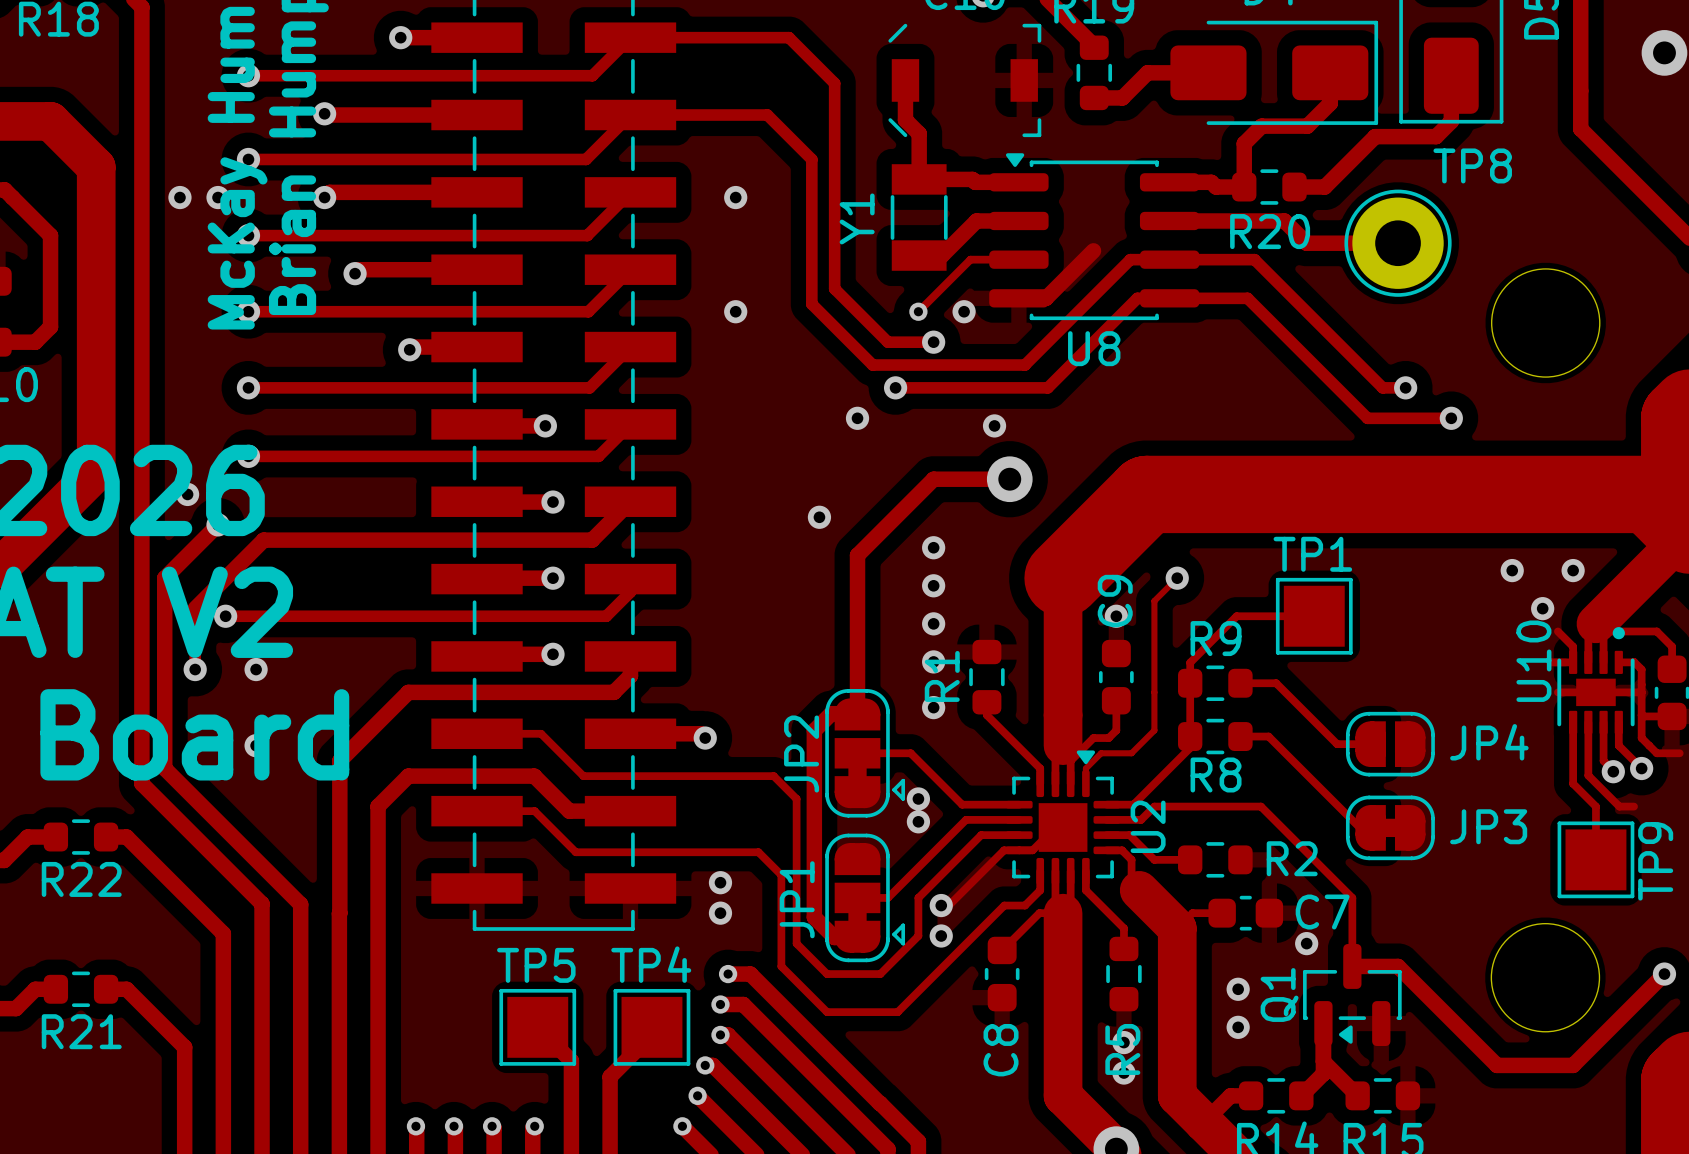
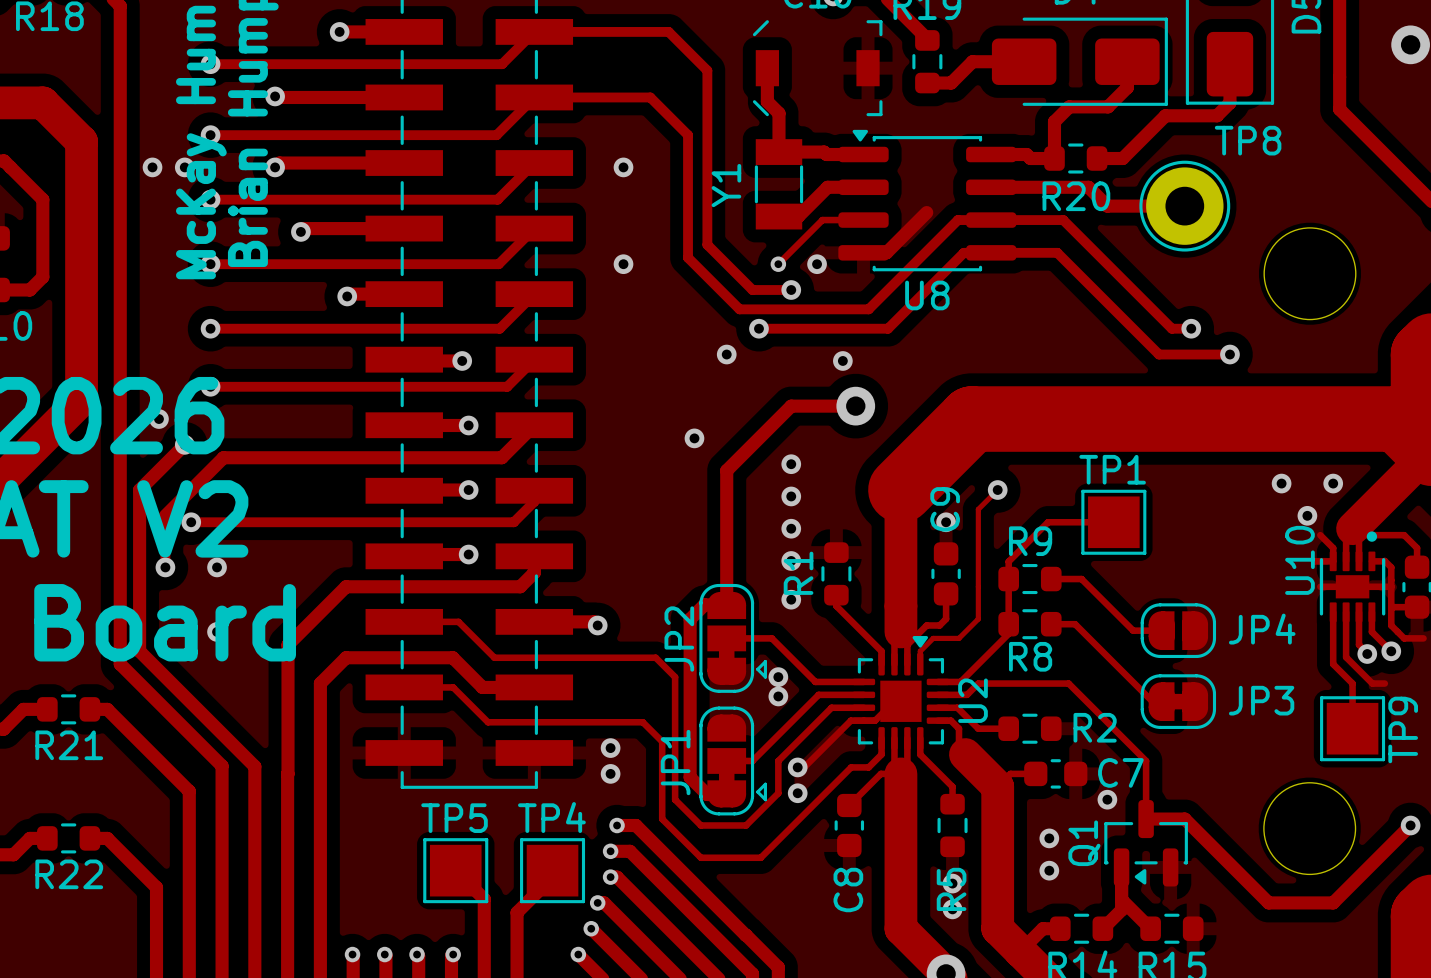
R22 name: R22 (81, 879) -> R21 (69, 745)
R21 name: R21 (81, 1031) -> R22 (69, 874)

